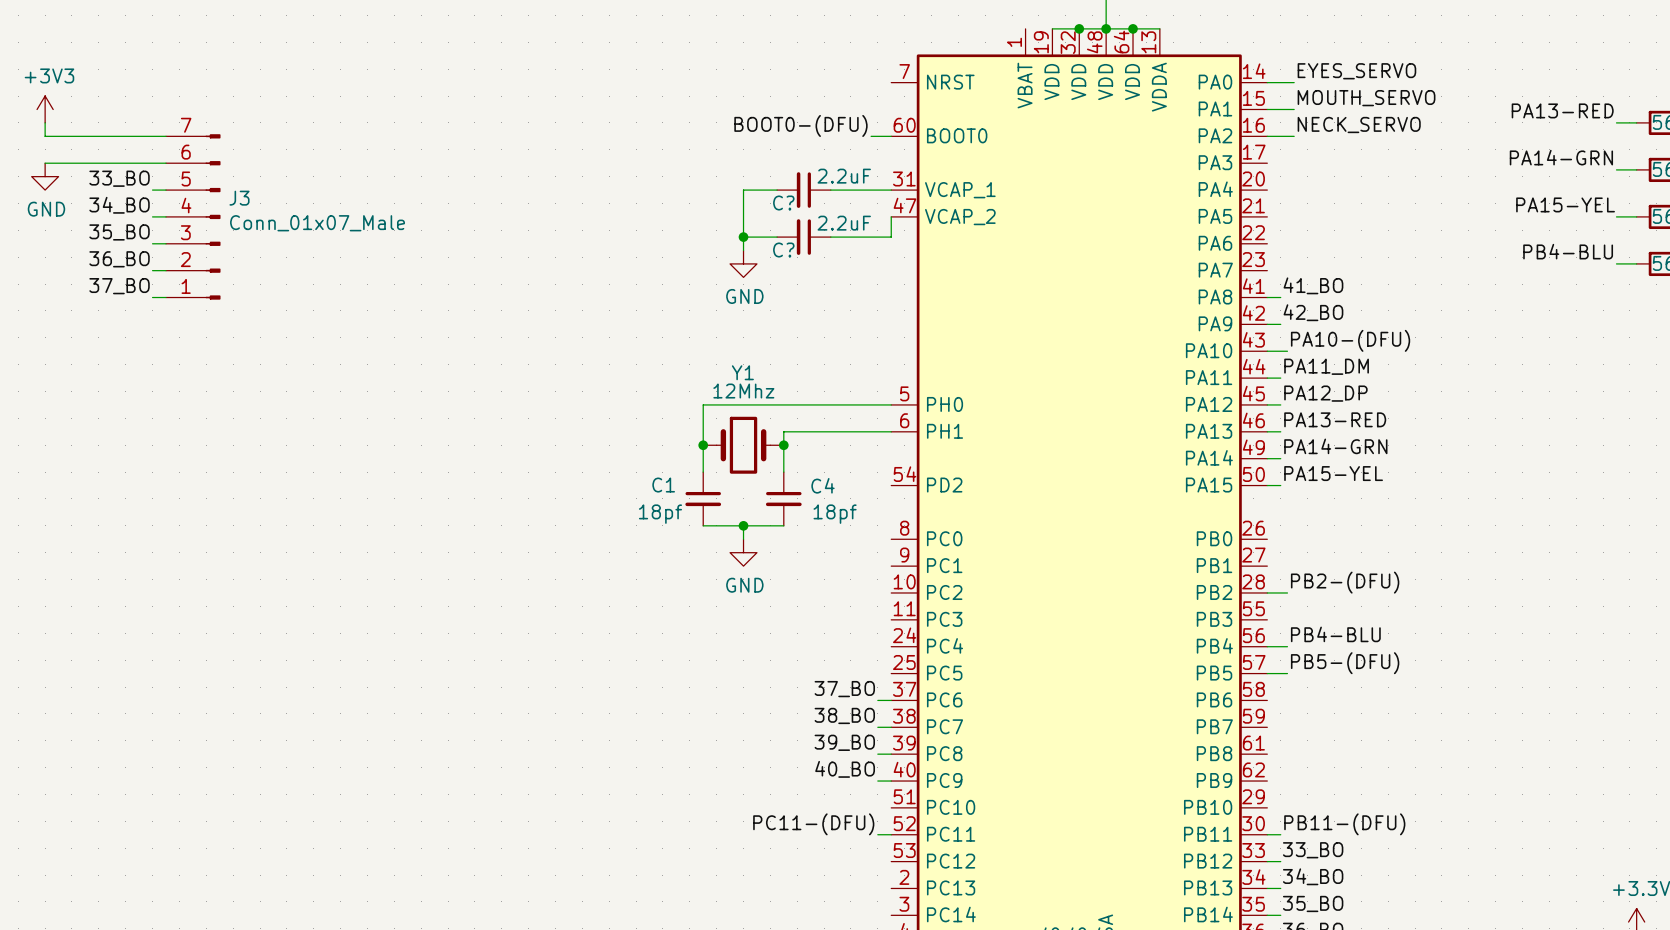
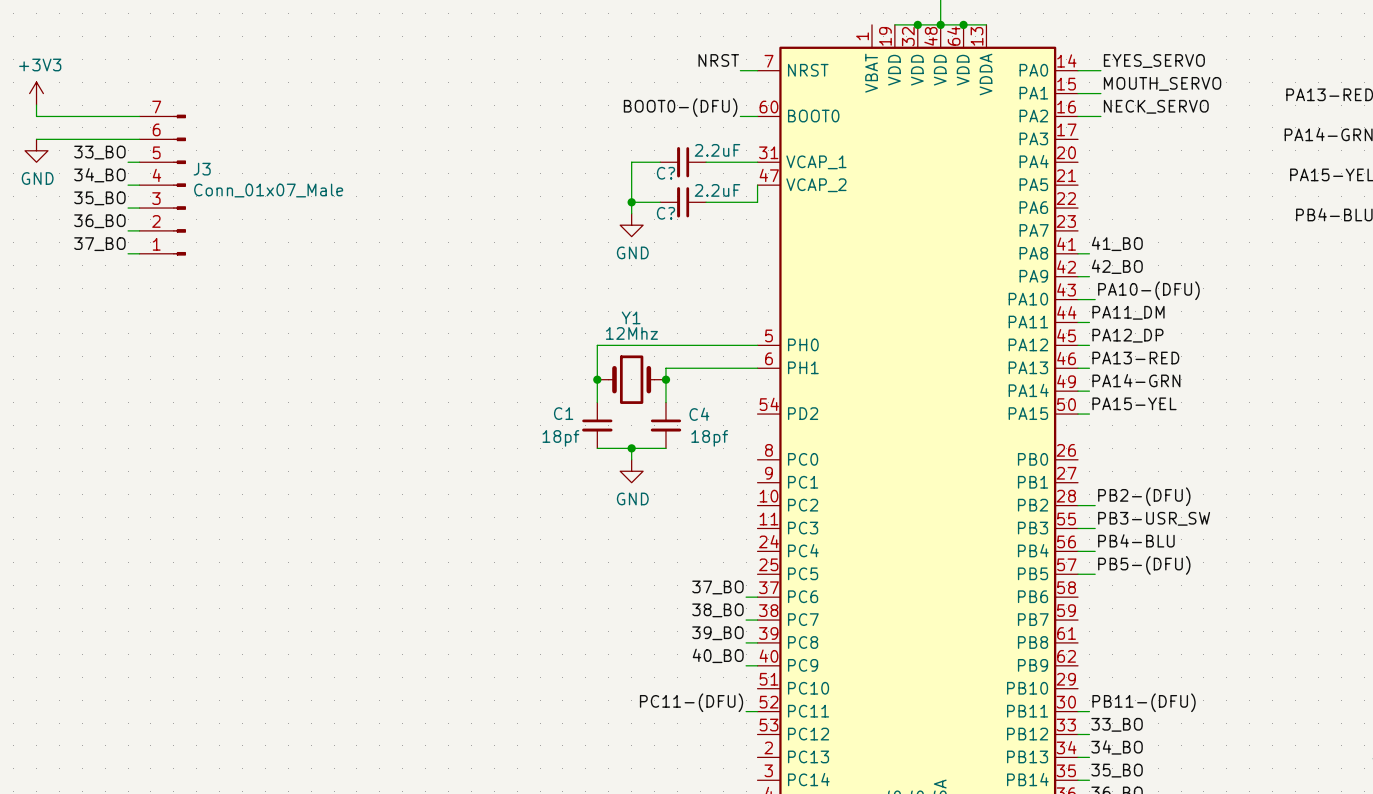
label: none -> NRST (718, 60)
wire: none -> (740, 70) (757, 70)
label: none -> PB3-USR_SW (1154, 518)
wire: none -> (1078, 528) (1095, 528)

